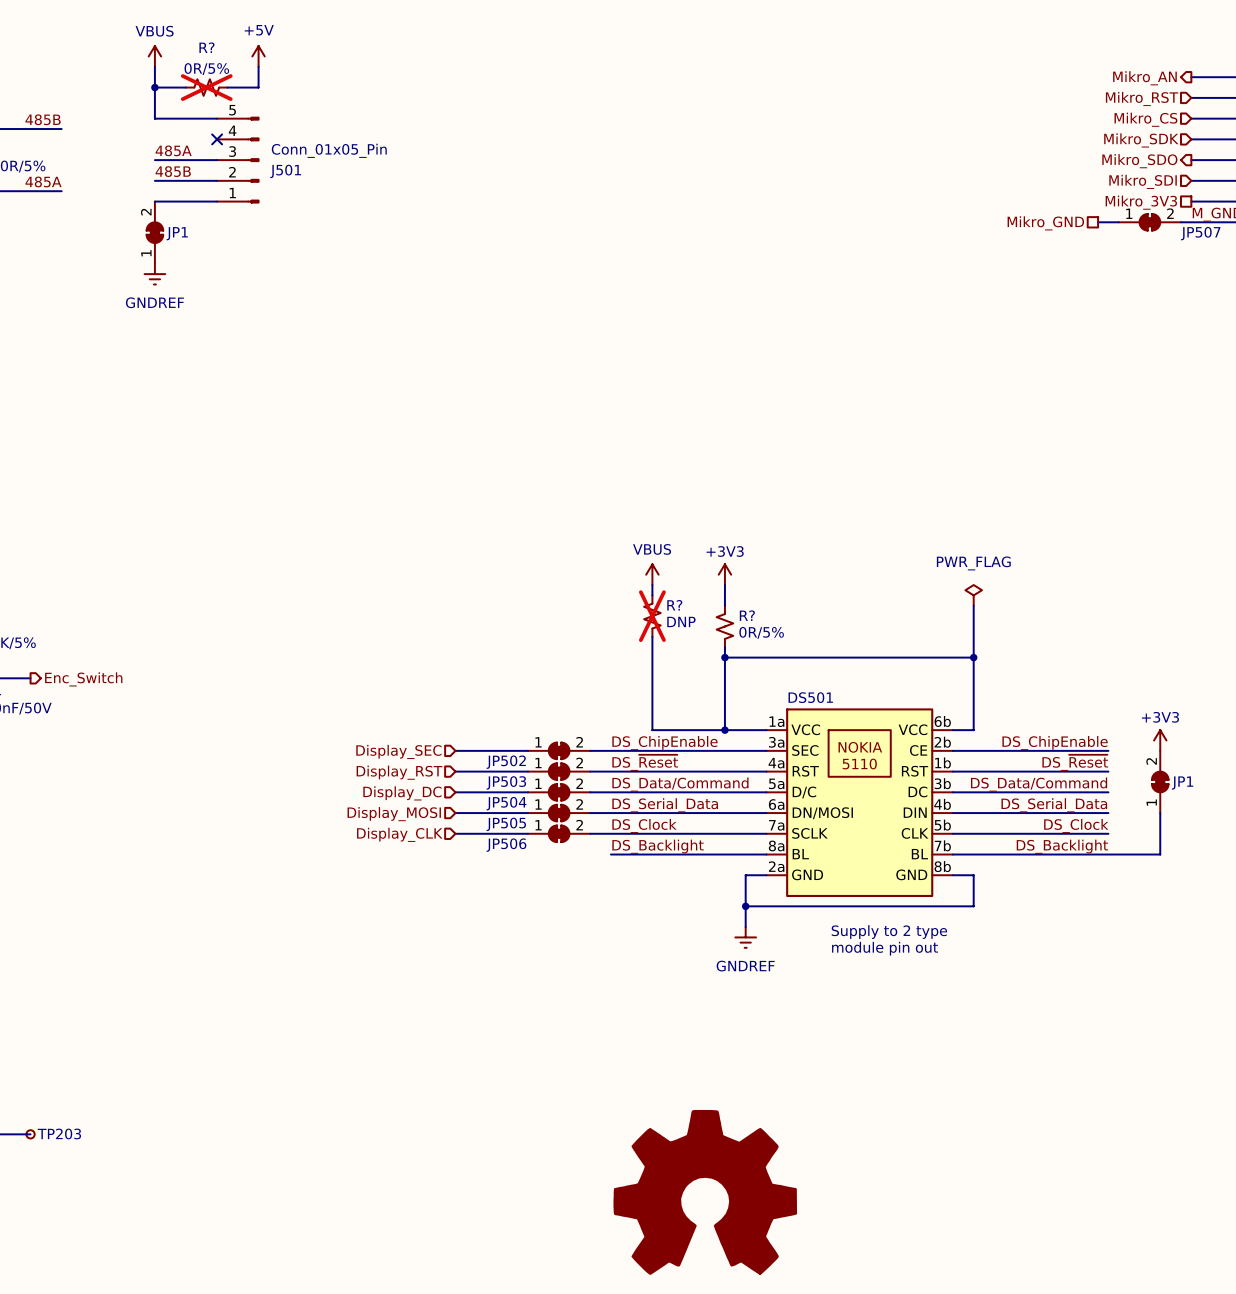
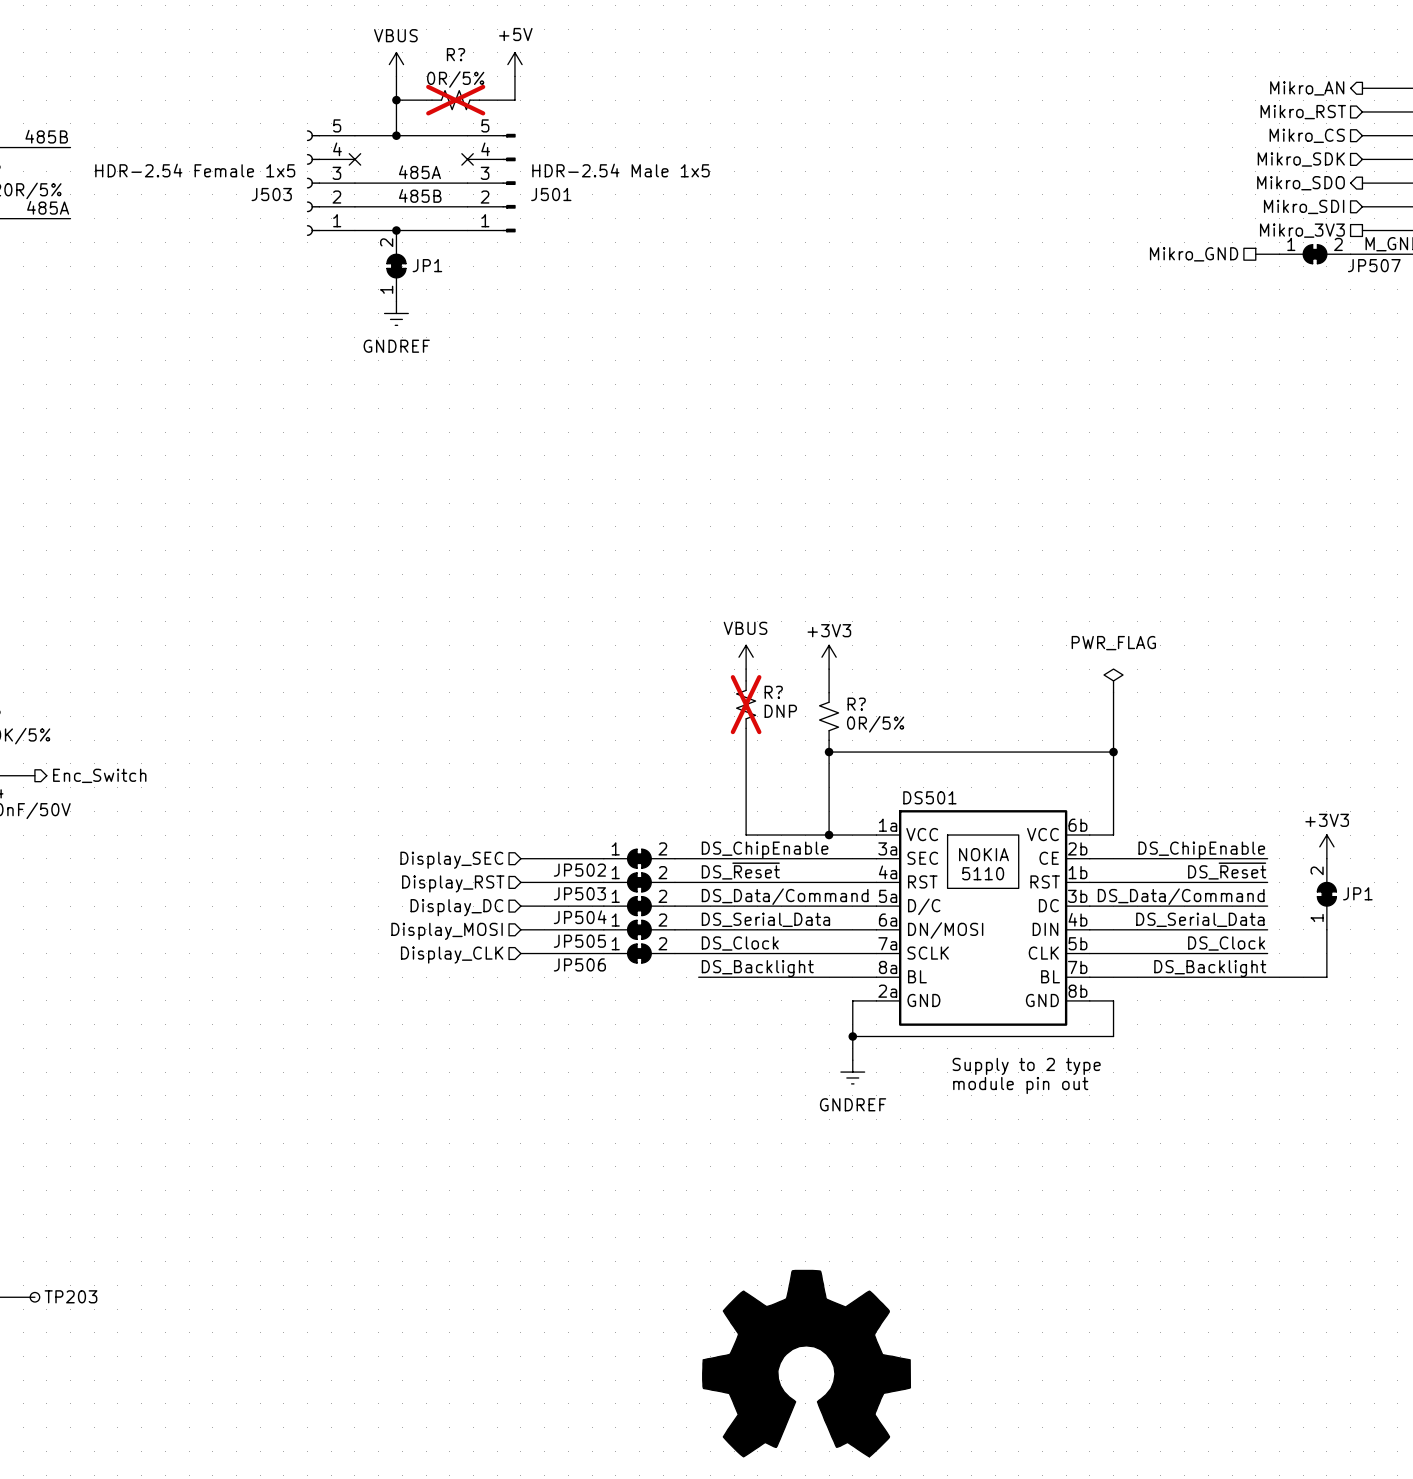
power symbol position: VBUS (154, 56) -> VBUS (396, 64)
power symbol position: +5V (258, 56) -> +5V (514, 64)
wire: (154, 66) (154, 118) (217, 118) -> none
wire: (258, 66) (258, 87) (227, 87) -> (514, 76) (514, 100) (479, 100)
wire: none -> (396, 76) (396, 135)
wire: (154, 87) (186, 87) -> (396, 100) (432, 100)
junction: (154, 87) -> none
R? position: (206, 87) -> (455, 100)
junction: none -> (396, 100)
wire: none -> (354, 135) (467, 135)
junction: none -> (396, 135)
no-connect mark: (217, 139) -> none
no-connect mark: none -> (354, 159)
no-connect mark: none -> (467, 159)
label position: 485A (173, 150) -> 485A (419, 172)
J501 value: Conn_01x05_Pin (329, 150) -> HDR-2.54 Male 1x5 (621, 170)
wire: (154, 160) (217, 160) -> none
J501 position: (238, 160) -> (491, 183)
J503: none -> HDR-2.54 Female 1x5 (330, 183)
wire: none -> (354, 183) (467, 183)
label position: 485B (173, 171) -> 485B (420, 195)
wire: (154, 180) (217, 180) -> none
wire: none -> (354, 206) (467, 206)
wire: (154, 201) (217, 201) -> none
wire: none -> (354, 230) (467, 230)
junction: none -> (396, 230)
JP1 position: (154, 232) -> (396, 266)
power symbol position: GNDREF (154, 274) -> GNDREF (396, 313)

